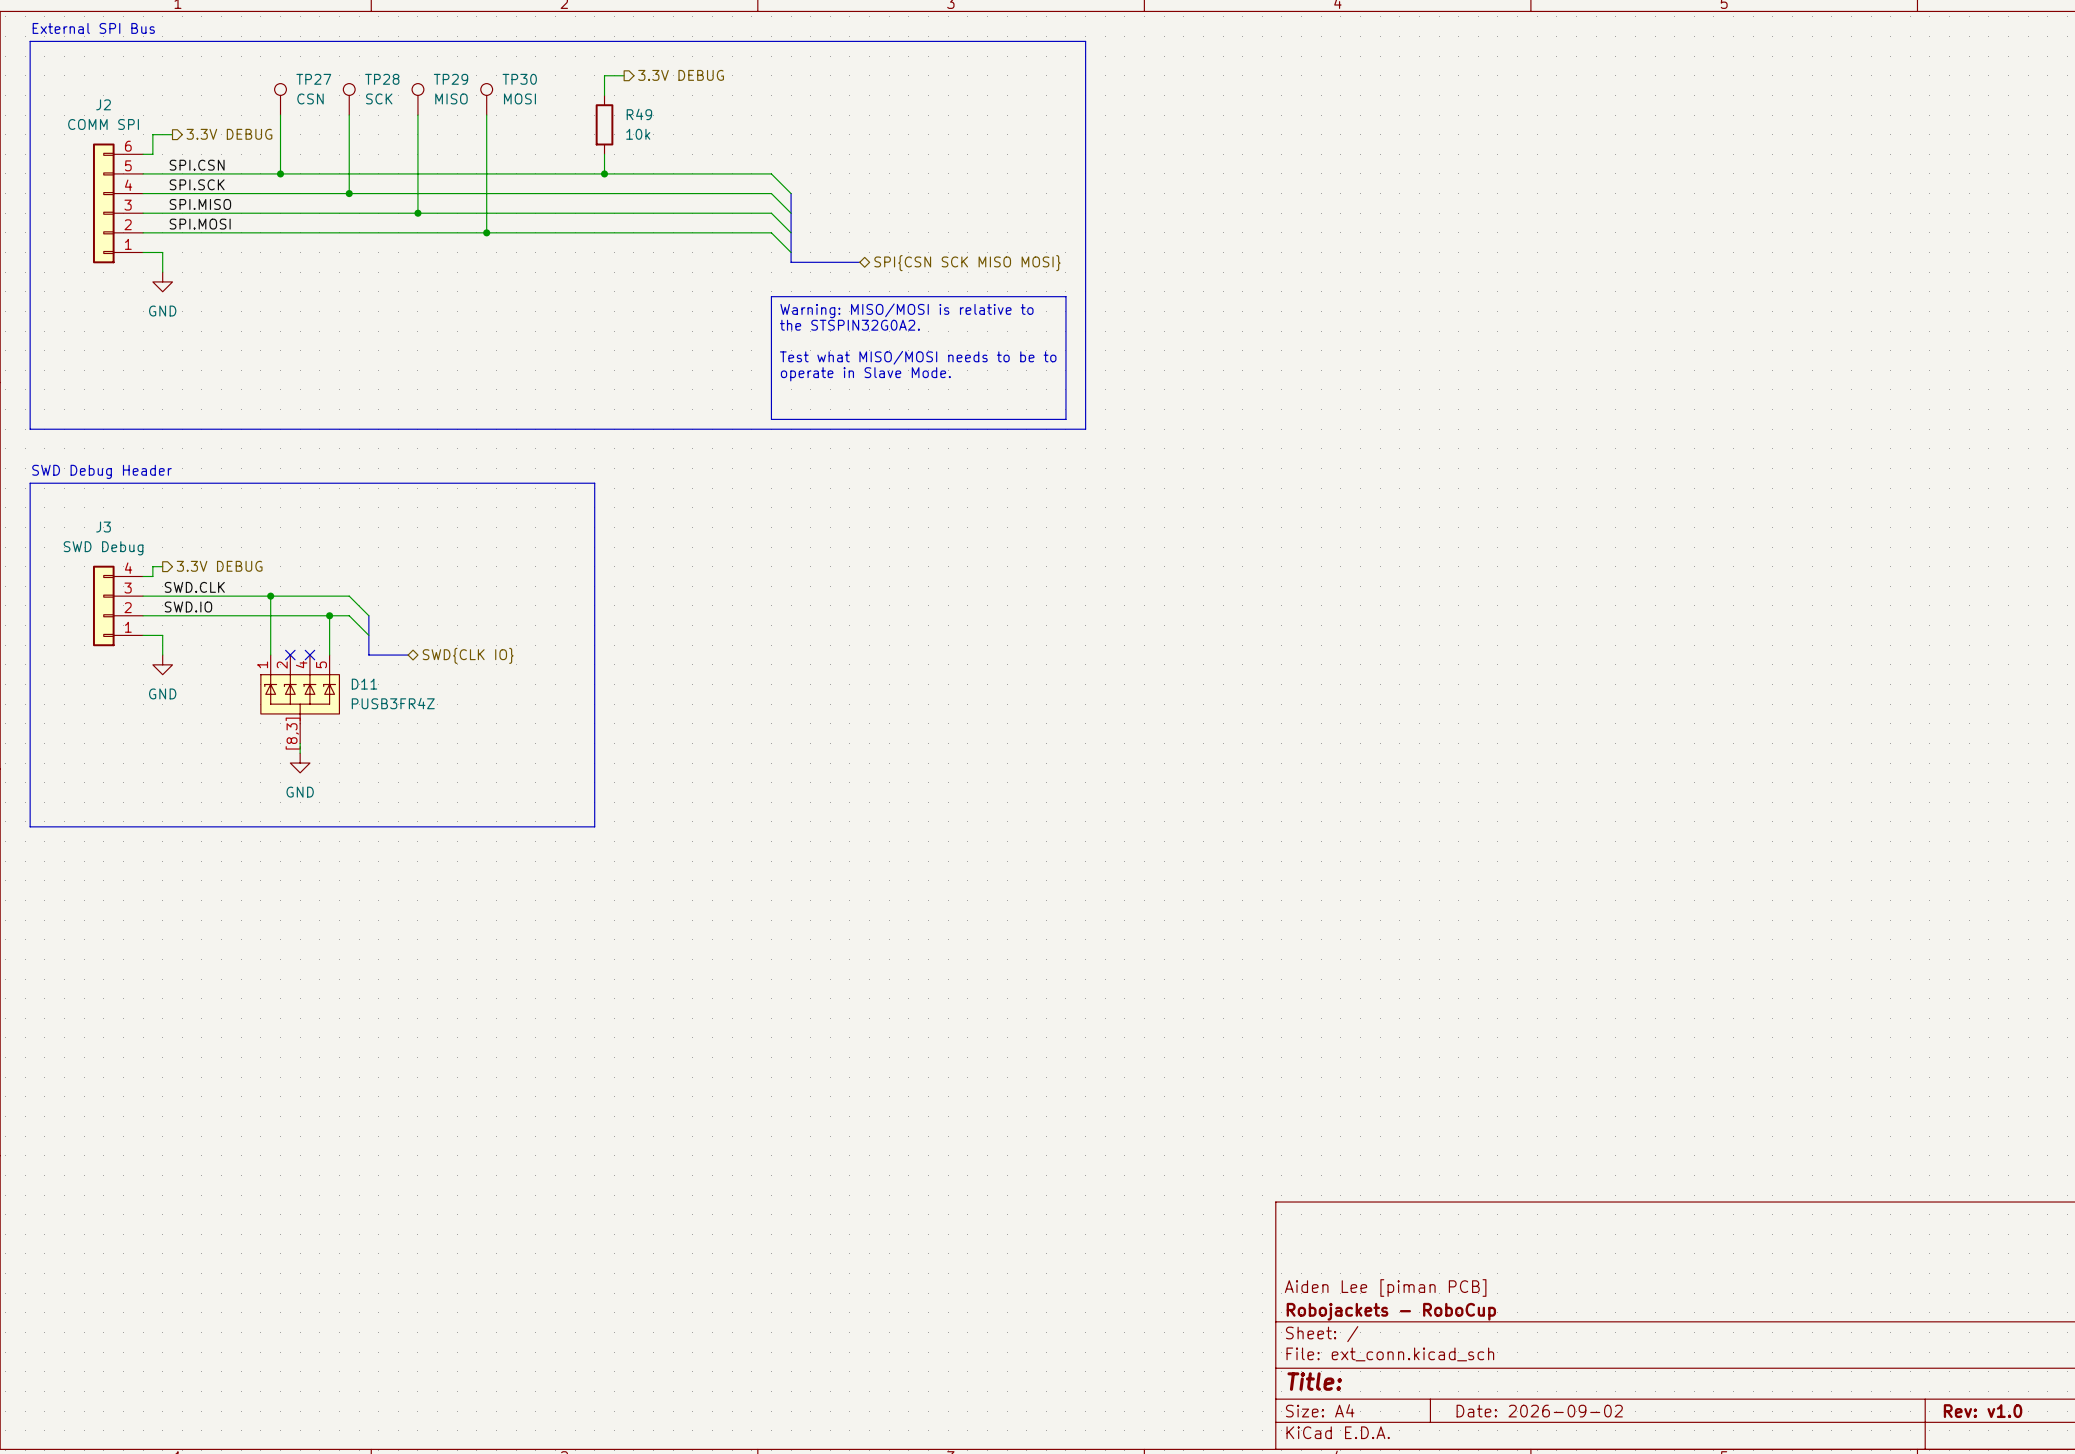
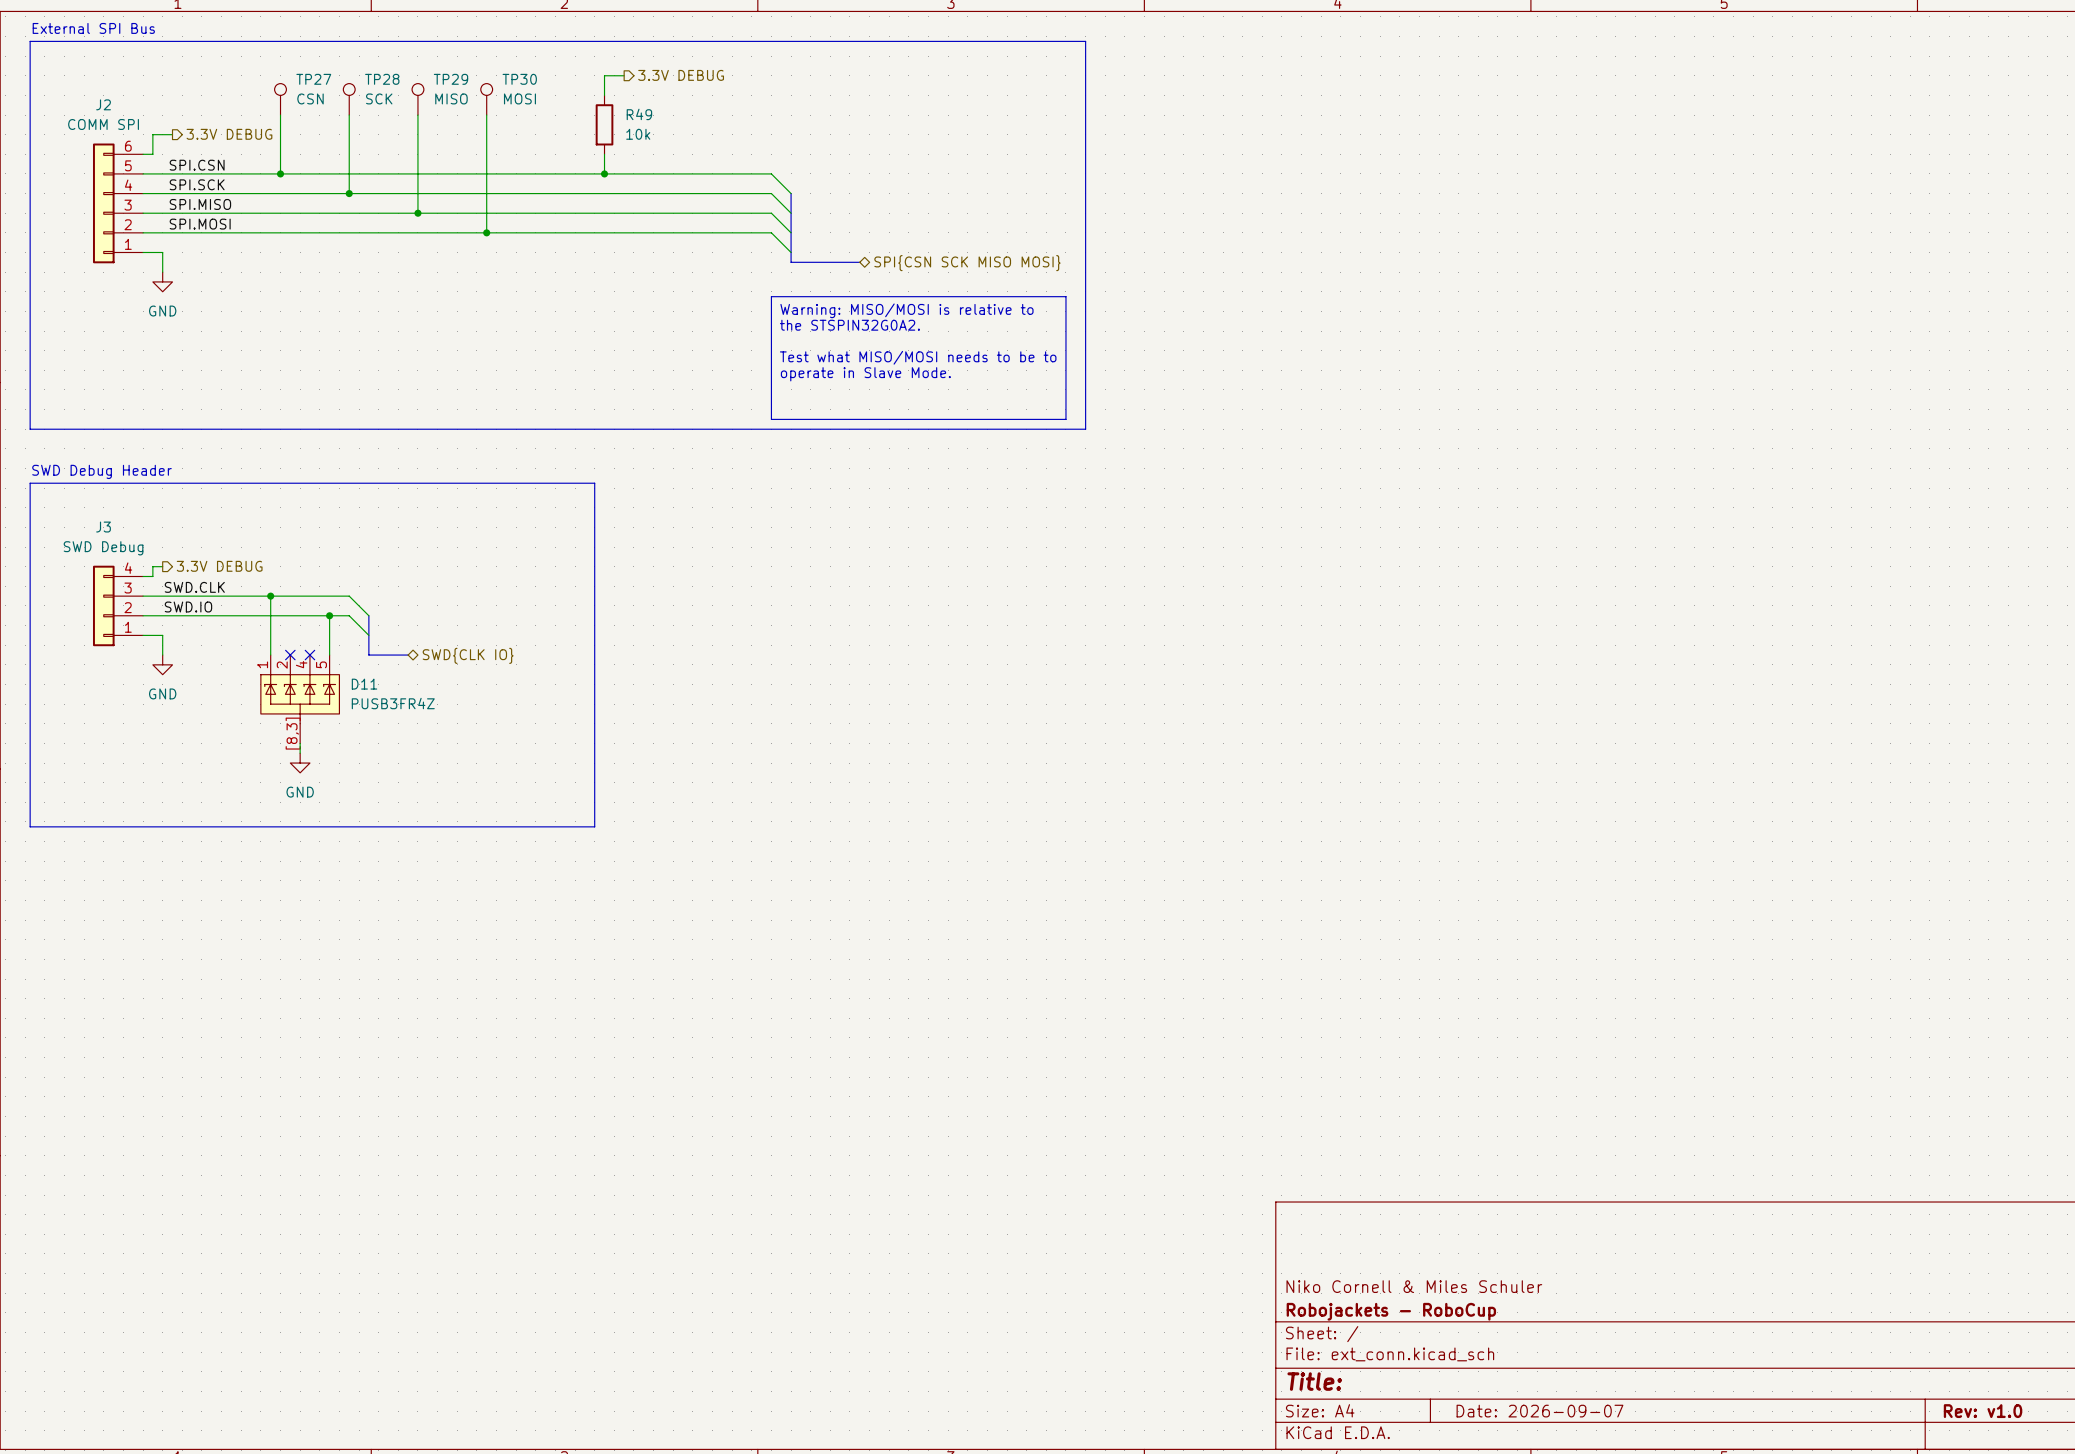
title block: Aiden Lee [piman PCB] (1385, 1287) -> Niko Cornell & Miles Schuler (1414, 1286)
title block: Date: 2026-09-02 (1539, 1411) -> Date: 2026-09-07 (1539, 1411)

